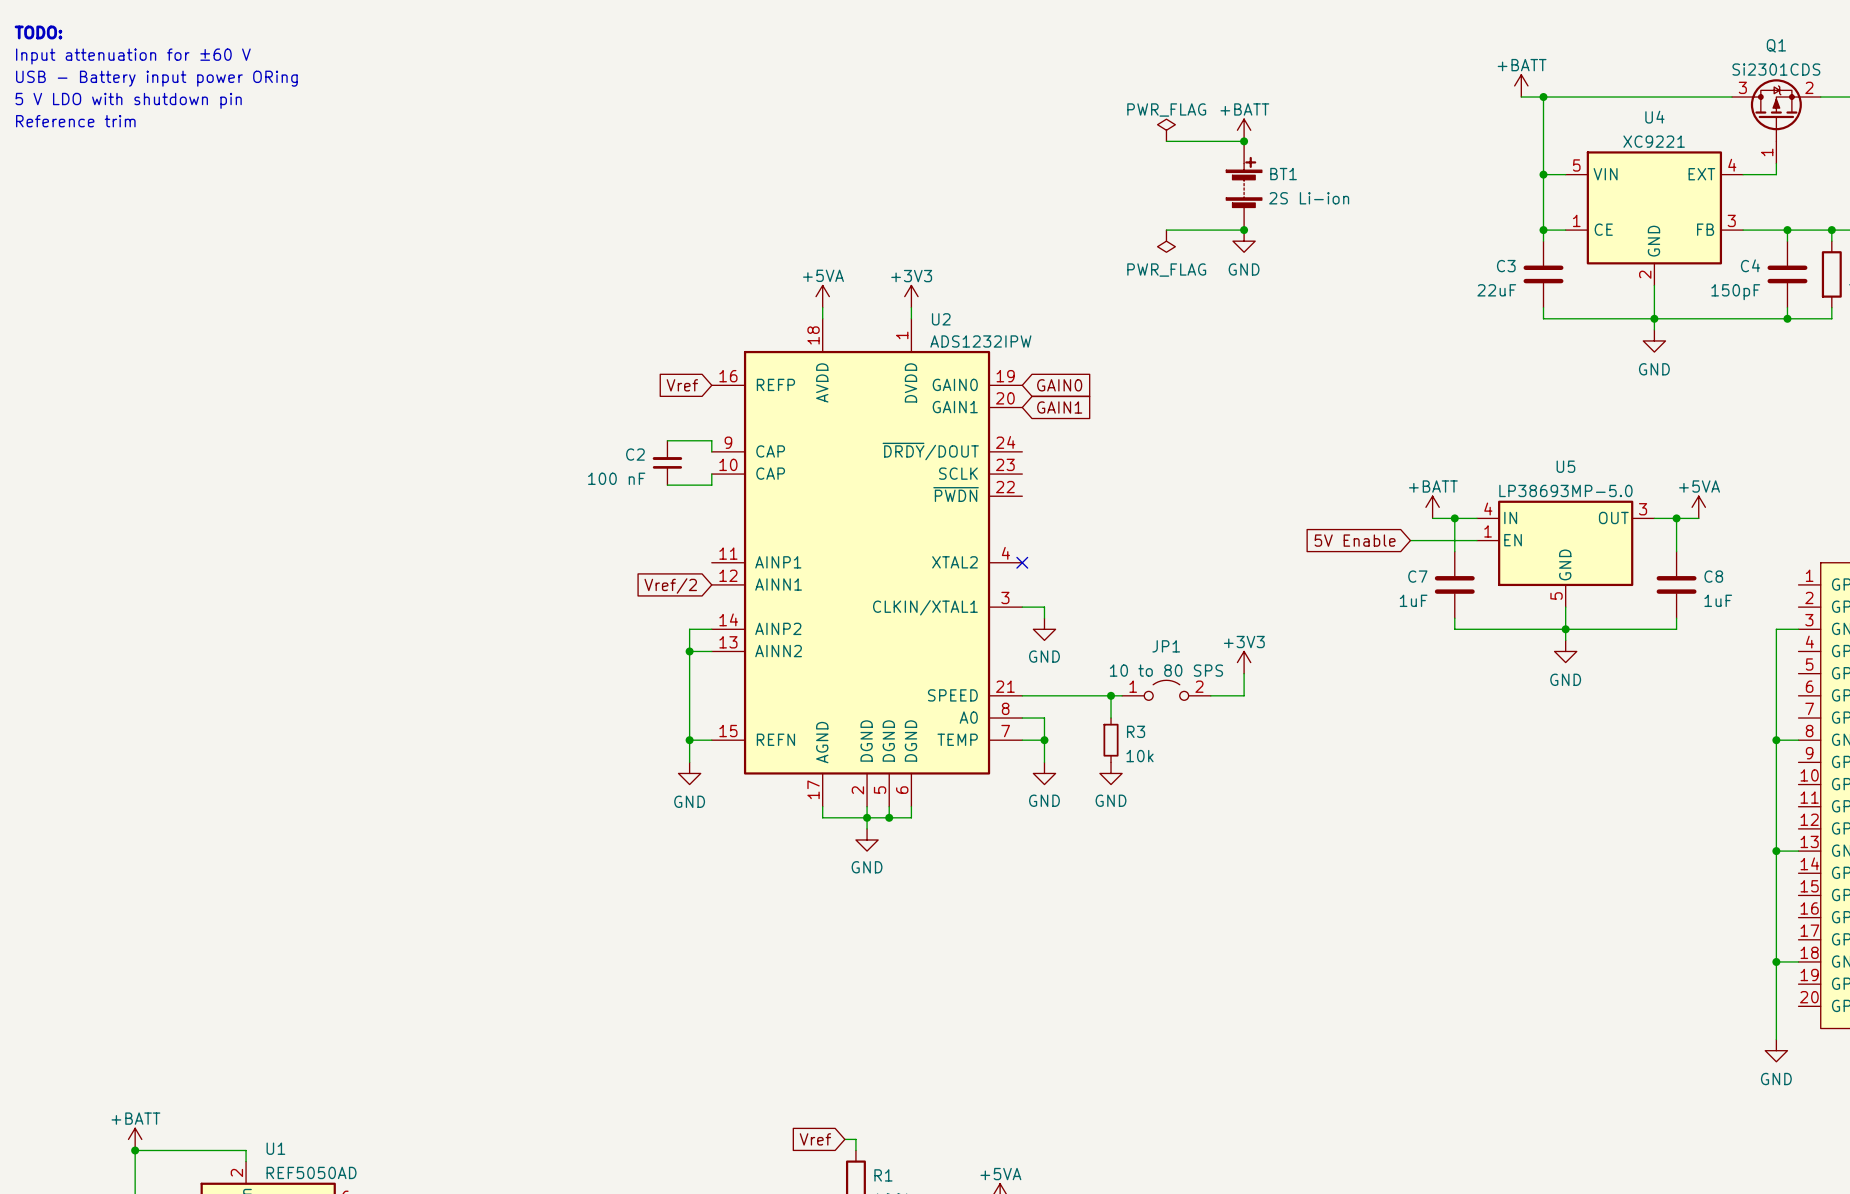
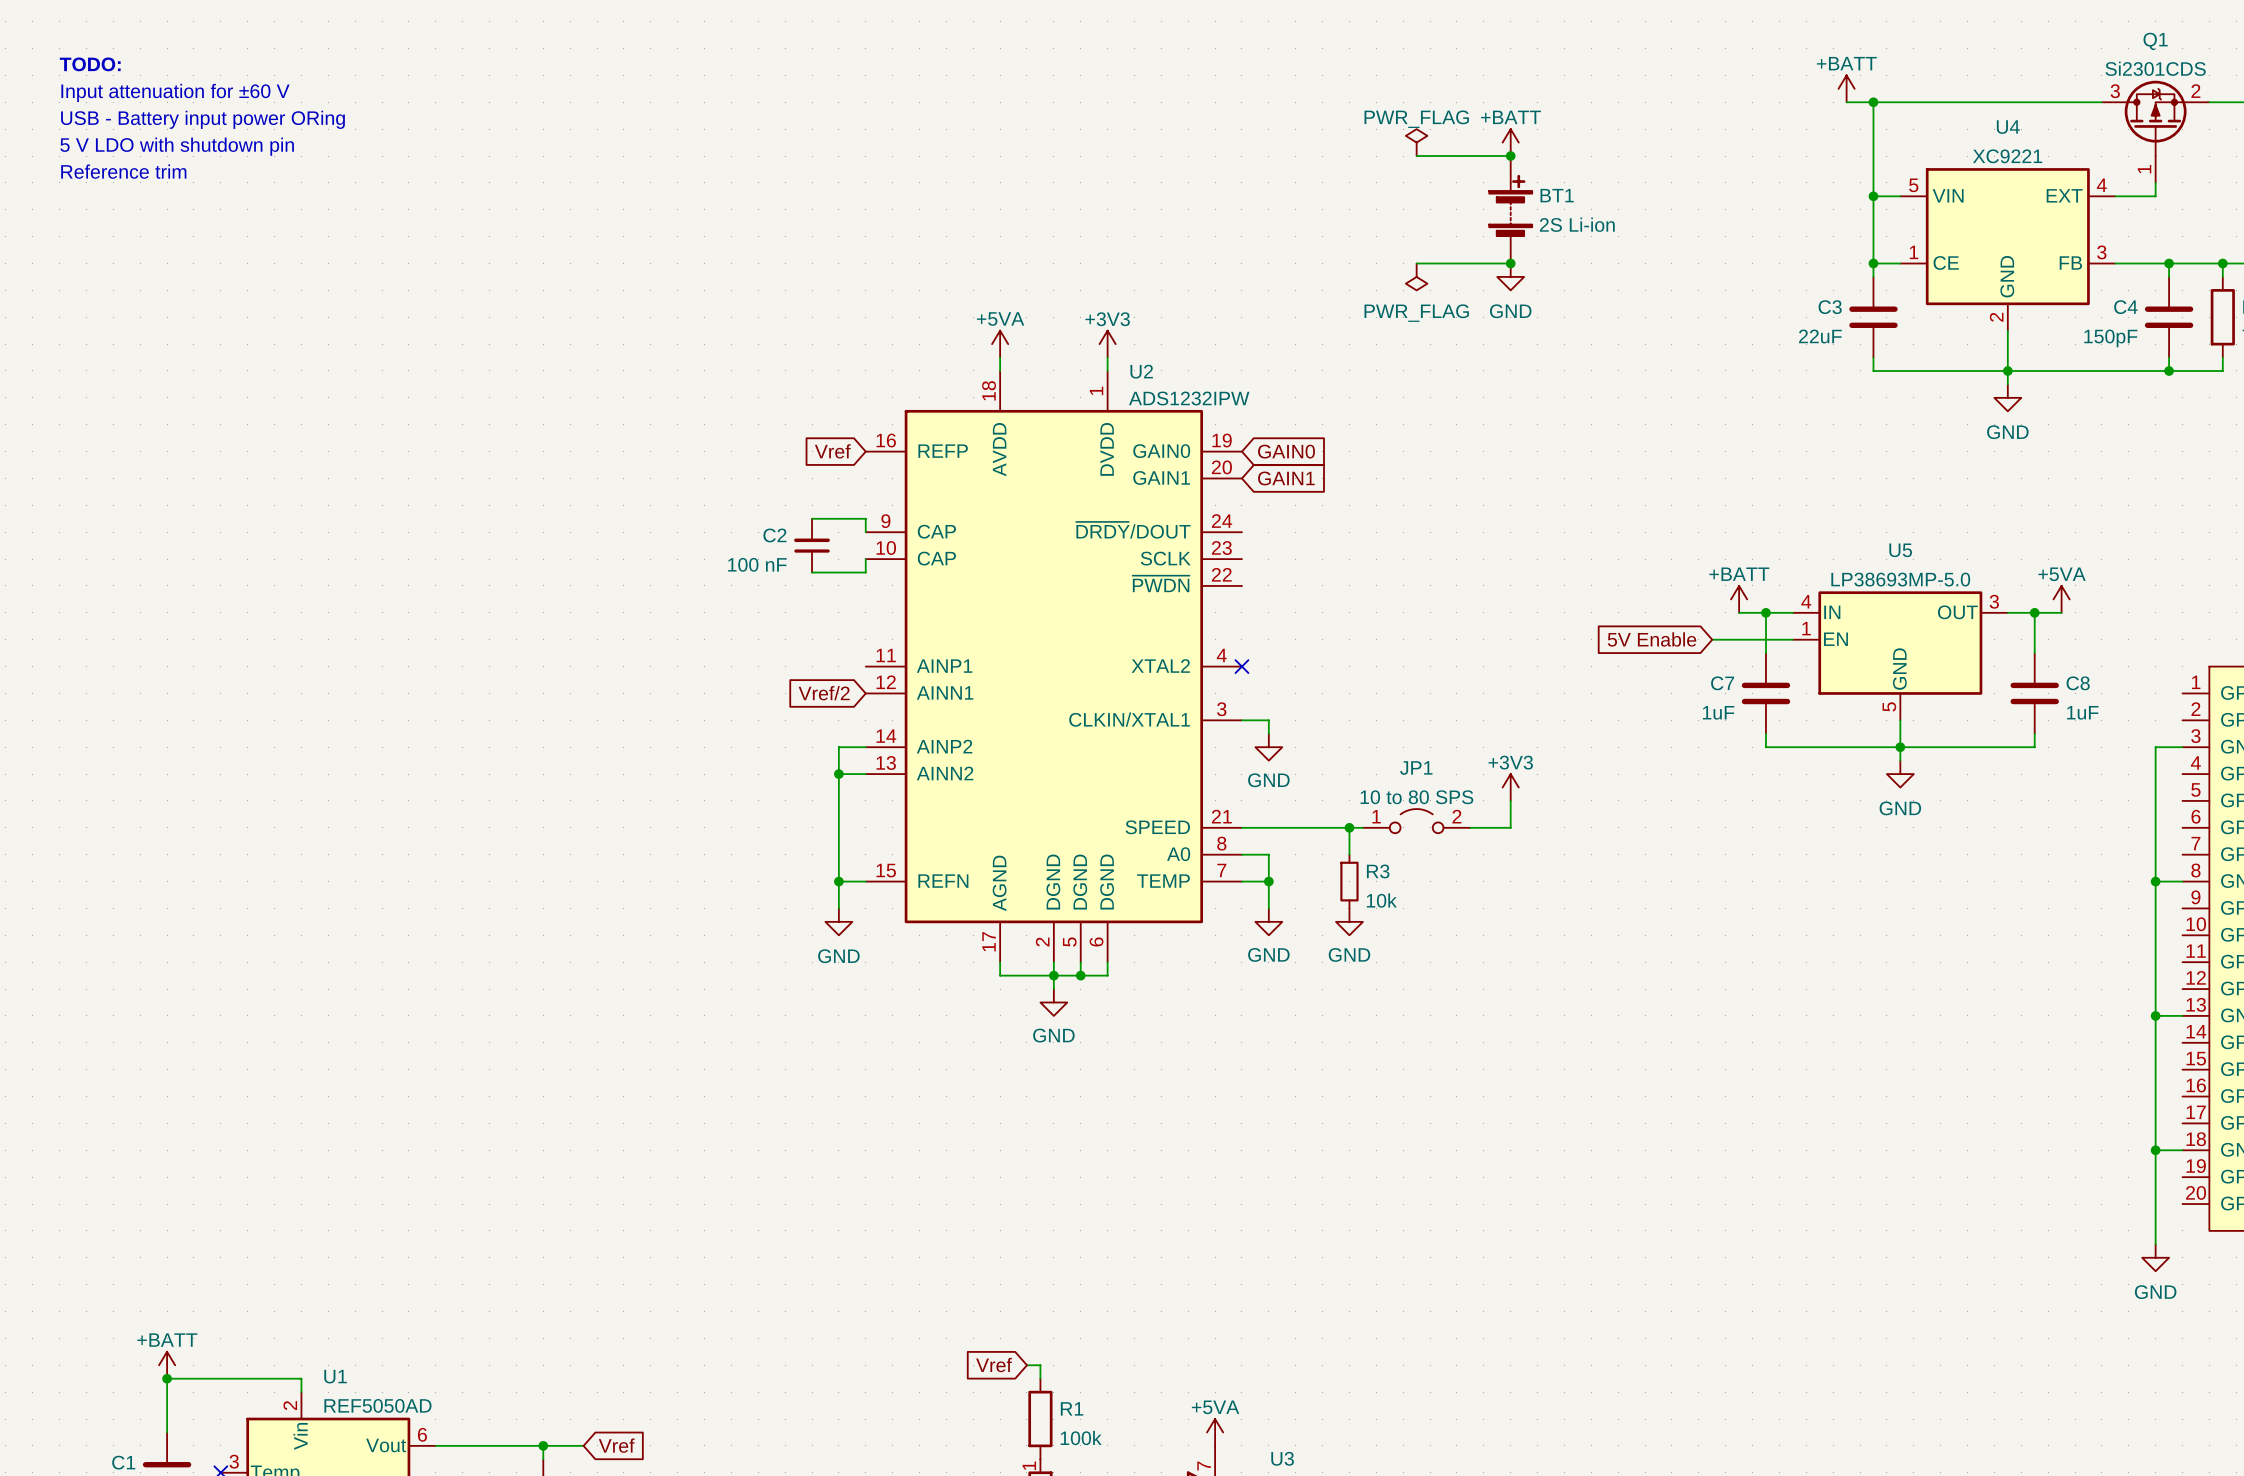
text position: TODO: (38, 32) -> TODO: (90, 64)
text position: Input attenuation for ±60 V (133, 56) -> Input attenuation for ±60 V (175, 92)
text position: USB - Battery input power ORing (156, 78) -> USB - Battery input power ORing (203, 119)
text position: 5 V LDO with shutdown pin (128, 100) -> 5 V LDO with shutdown pin (177, 146)
text position: Reference trim (75, 121) -> Reference trim (123, 171)

